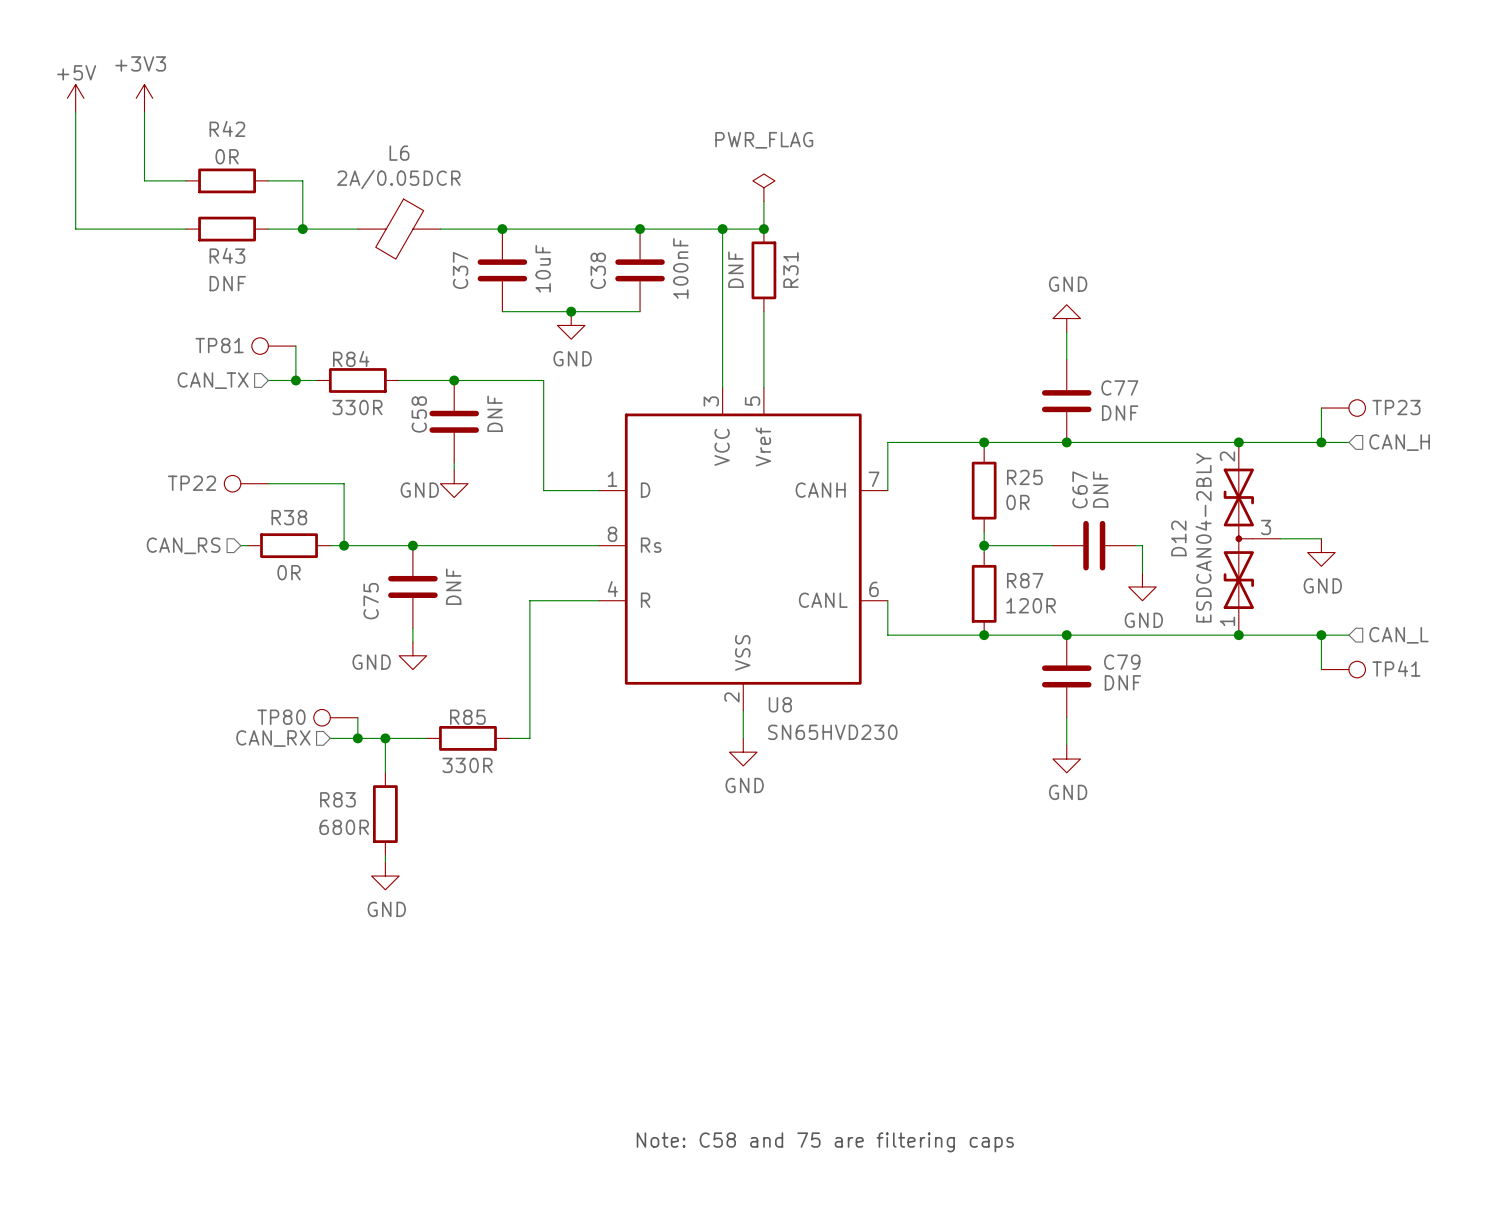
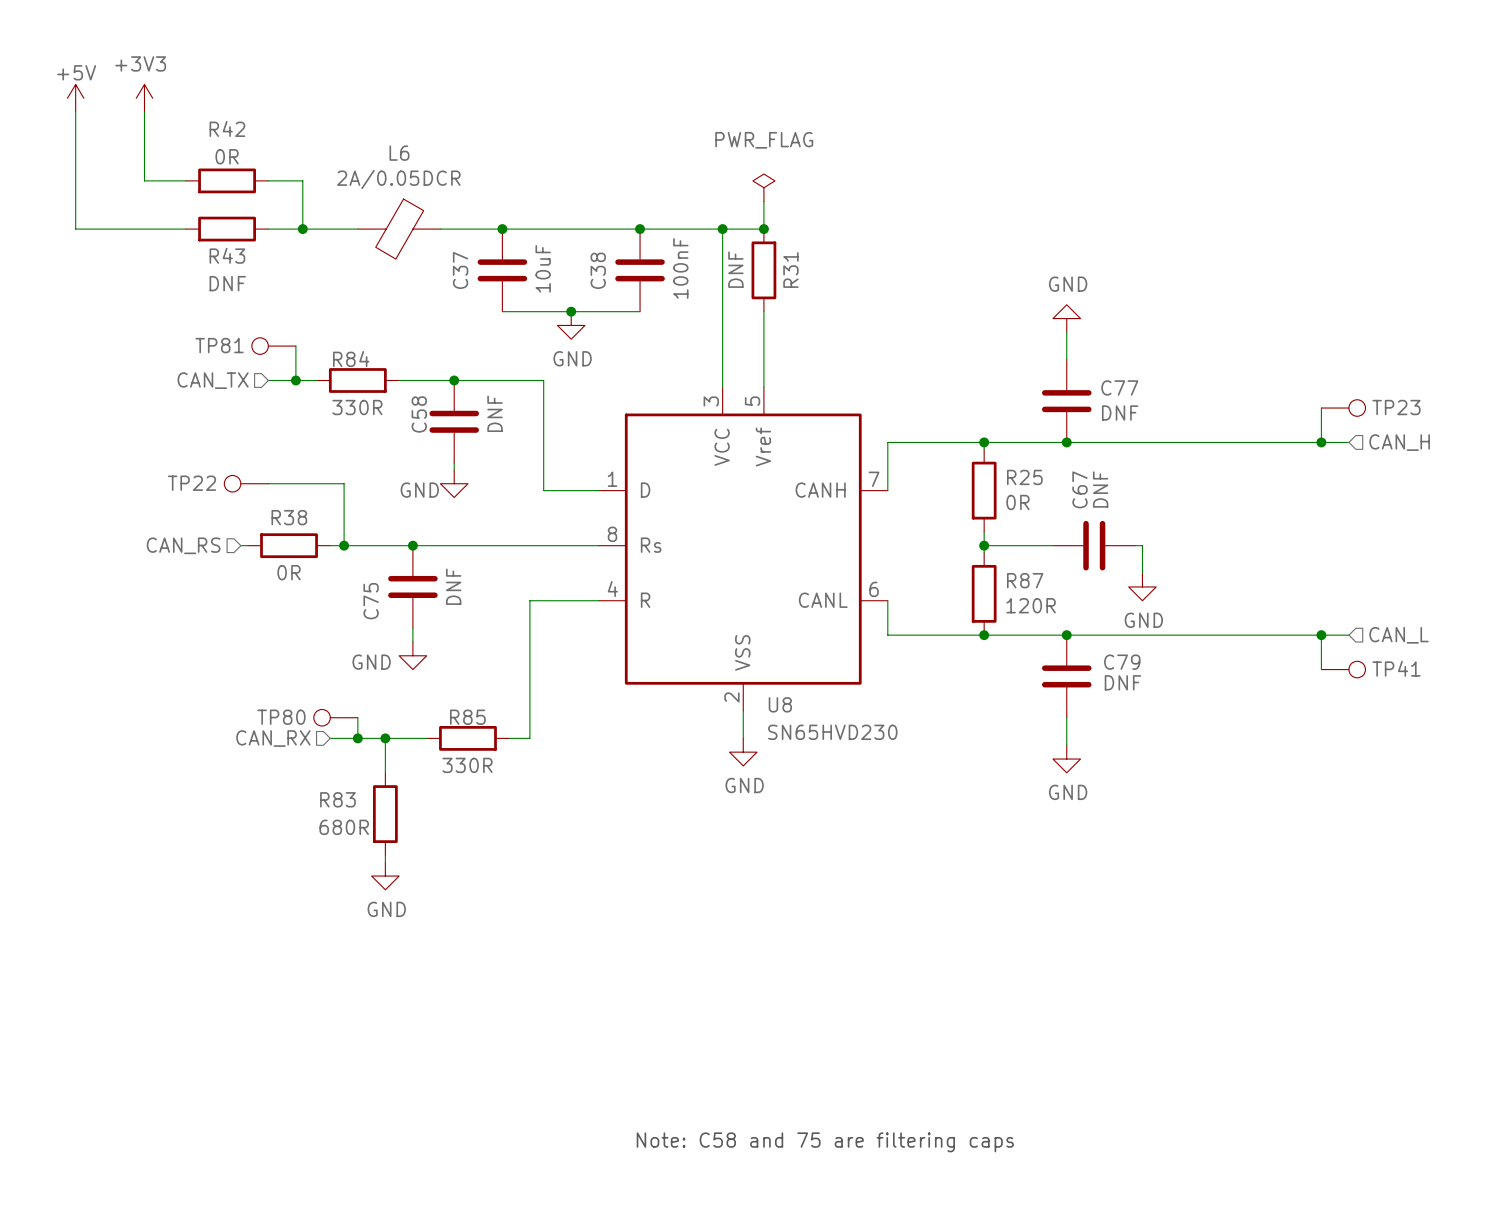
junction: (1238, 442) -> none
D12: ESDCAN04-2BLY (1251, 538) -> none
wire: (1280, 538) (1321, 538) -> none
power symbol: GND (1321, 552) -> none
junction: (1238, 635) -> none

